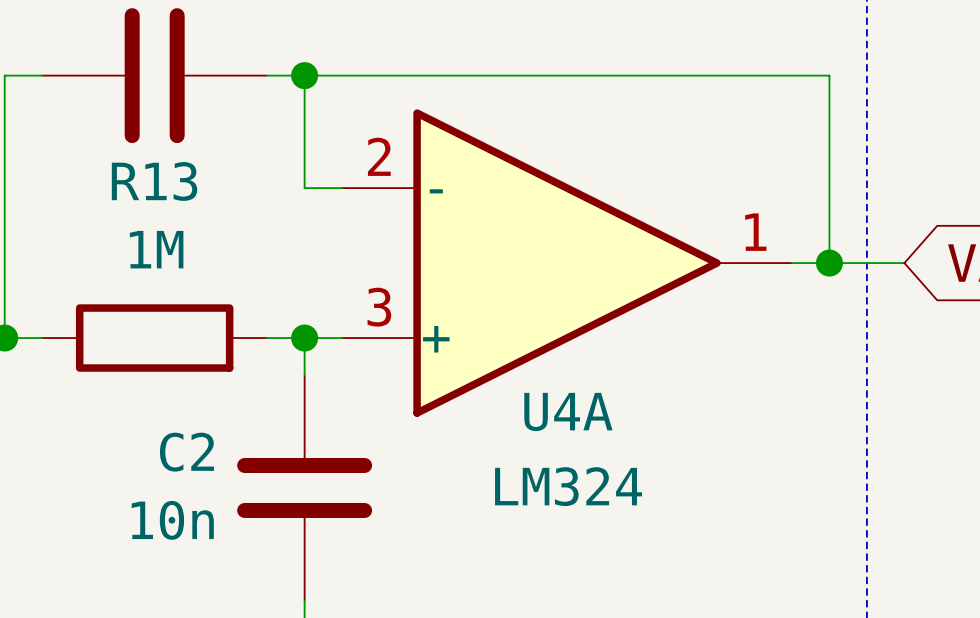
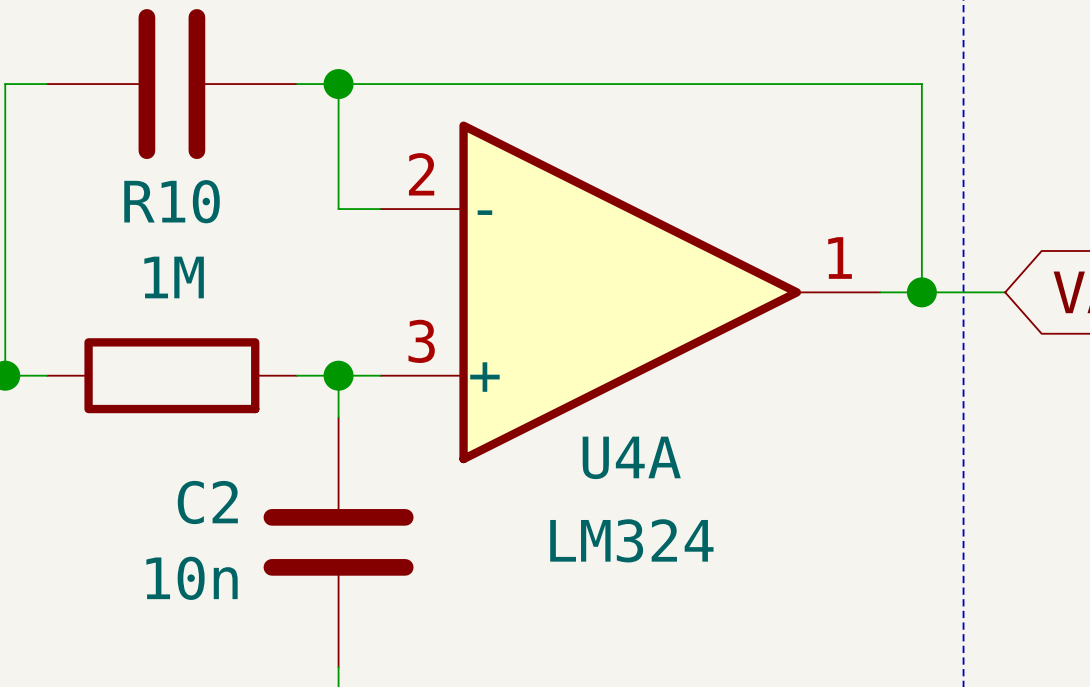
R13 name: R13 (154, 181) -> R10 (172, 201)

